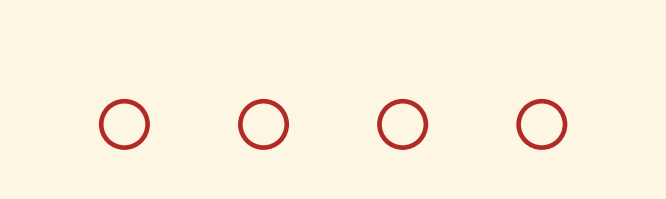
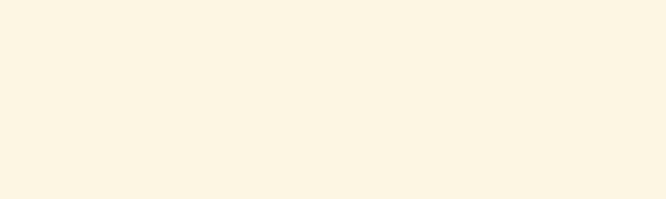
part: (124, 124) -> none
part: (263, 124) -> none
part: (402, 124) -> none
part: (541, 124) -> none

